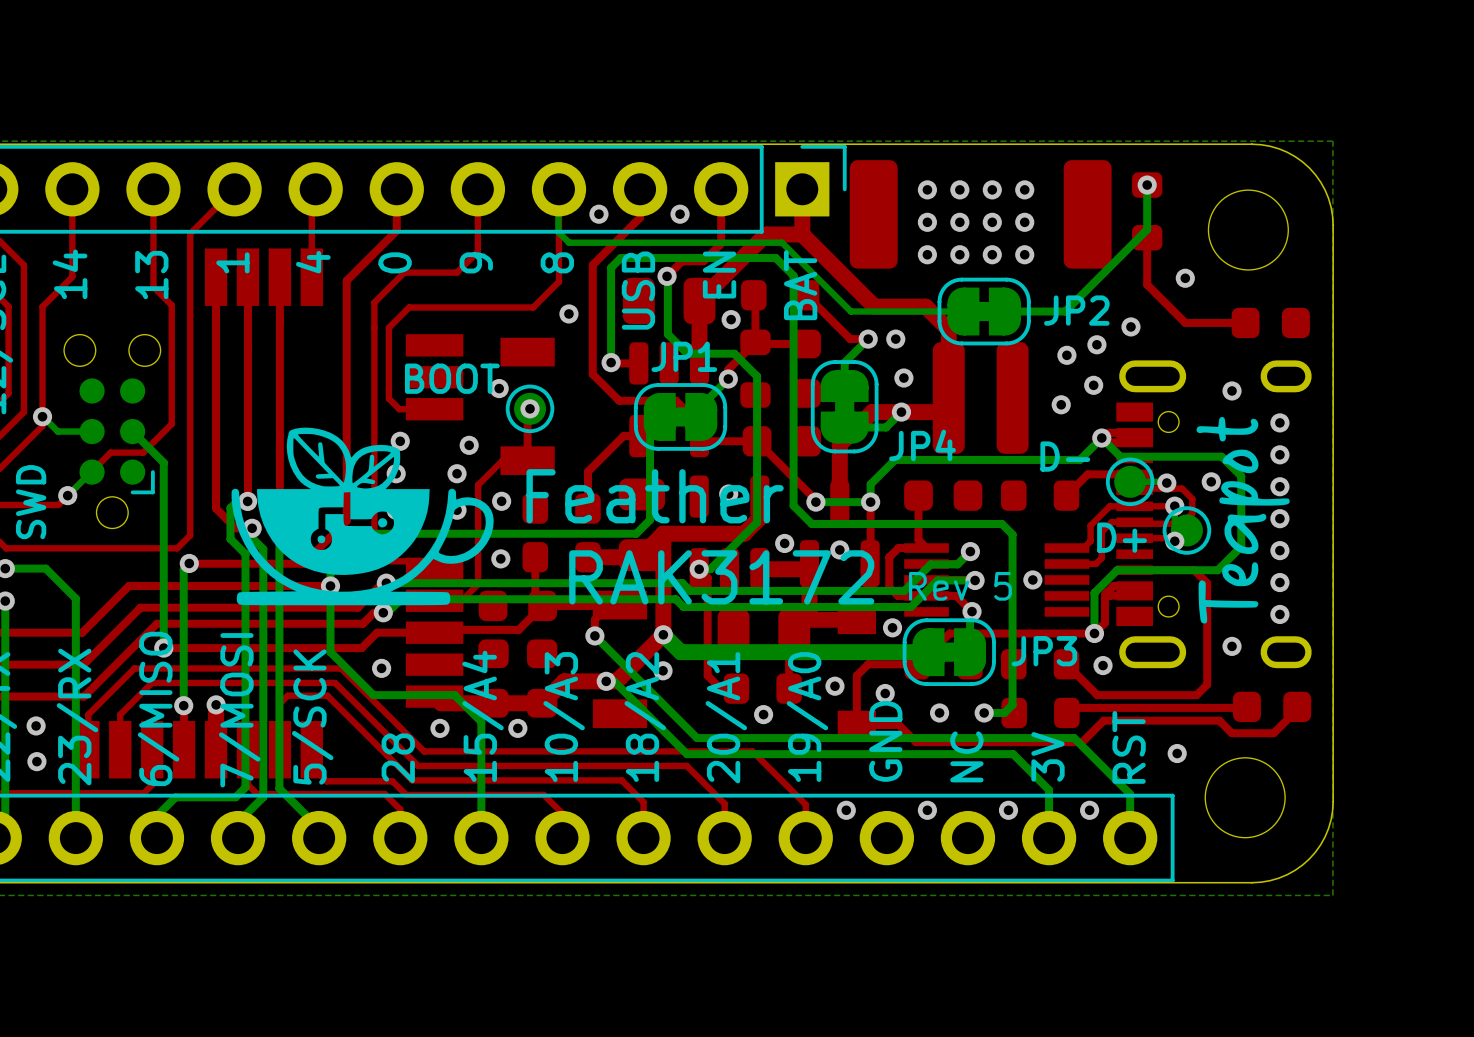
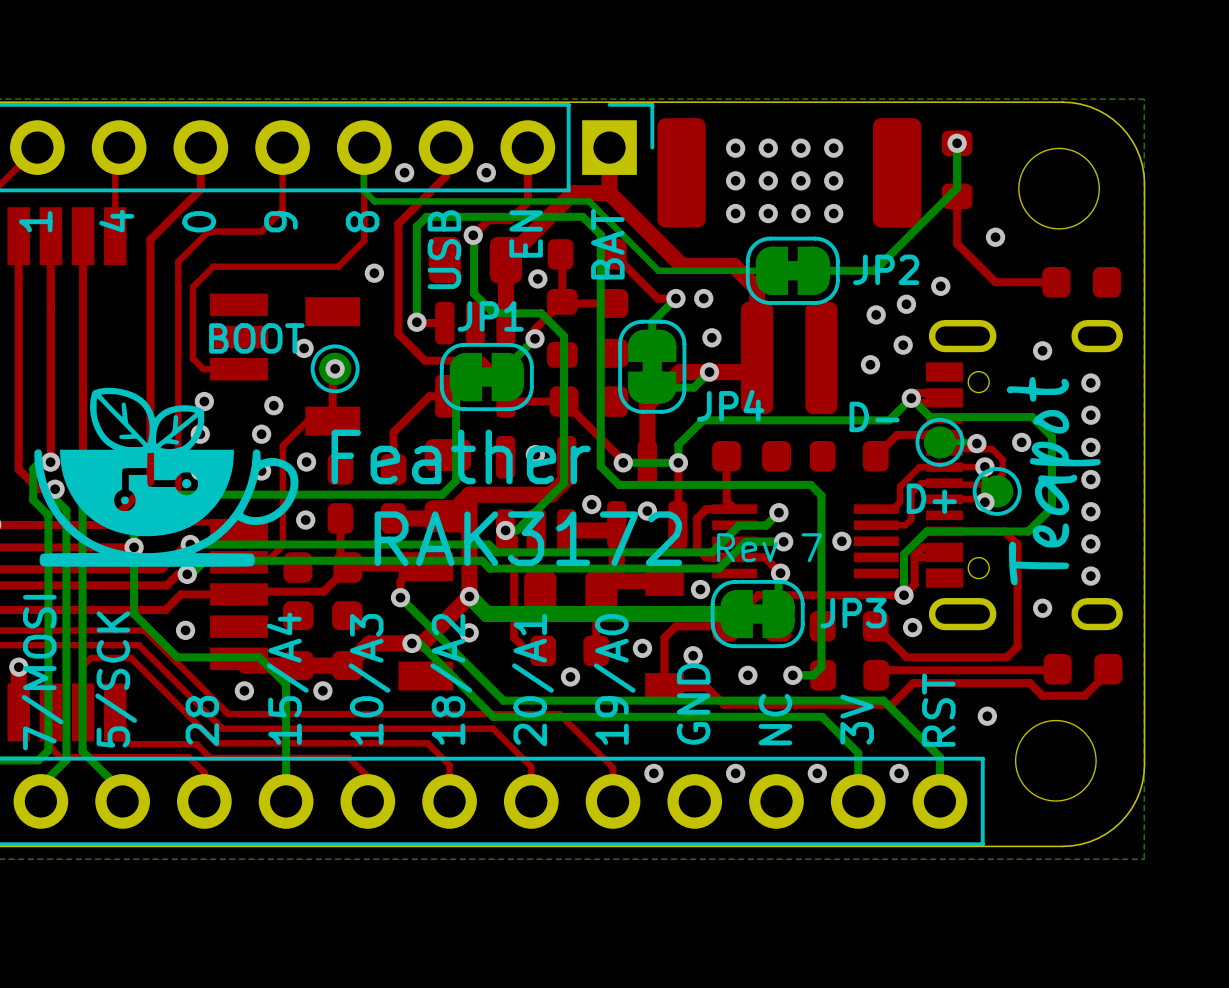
text: Rev 5 (960, 586) -> Rev 7 (769, 547)

